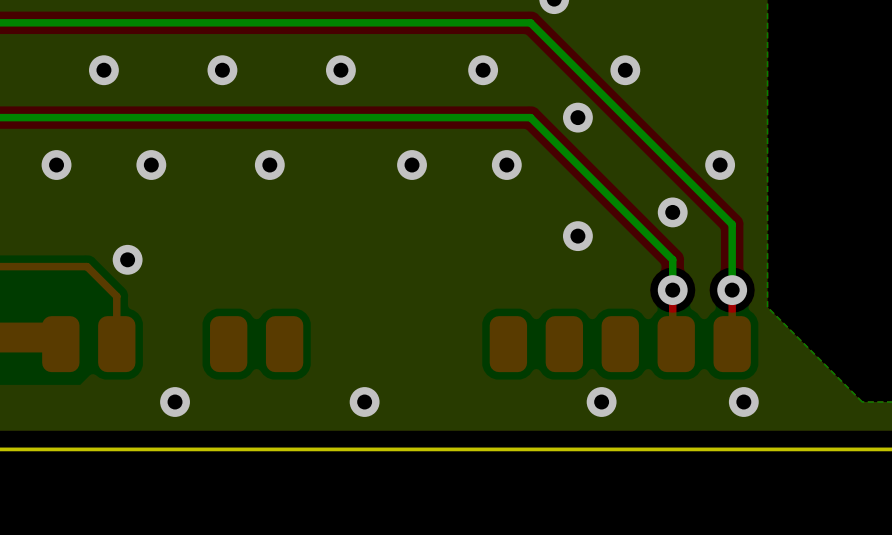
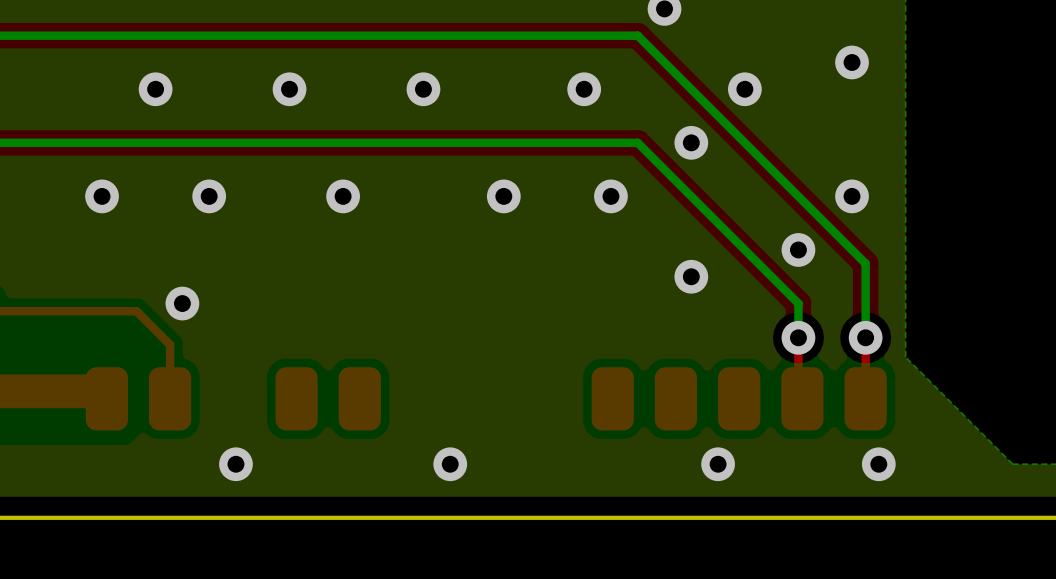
via: none -> (852, 62)

